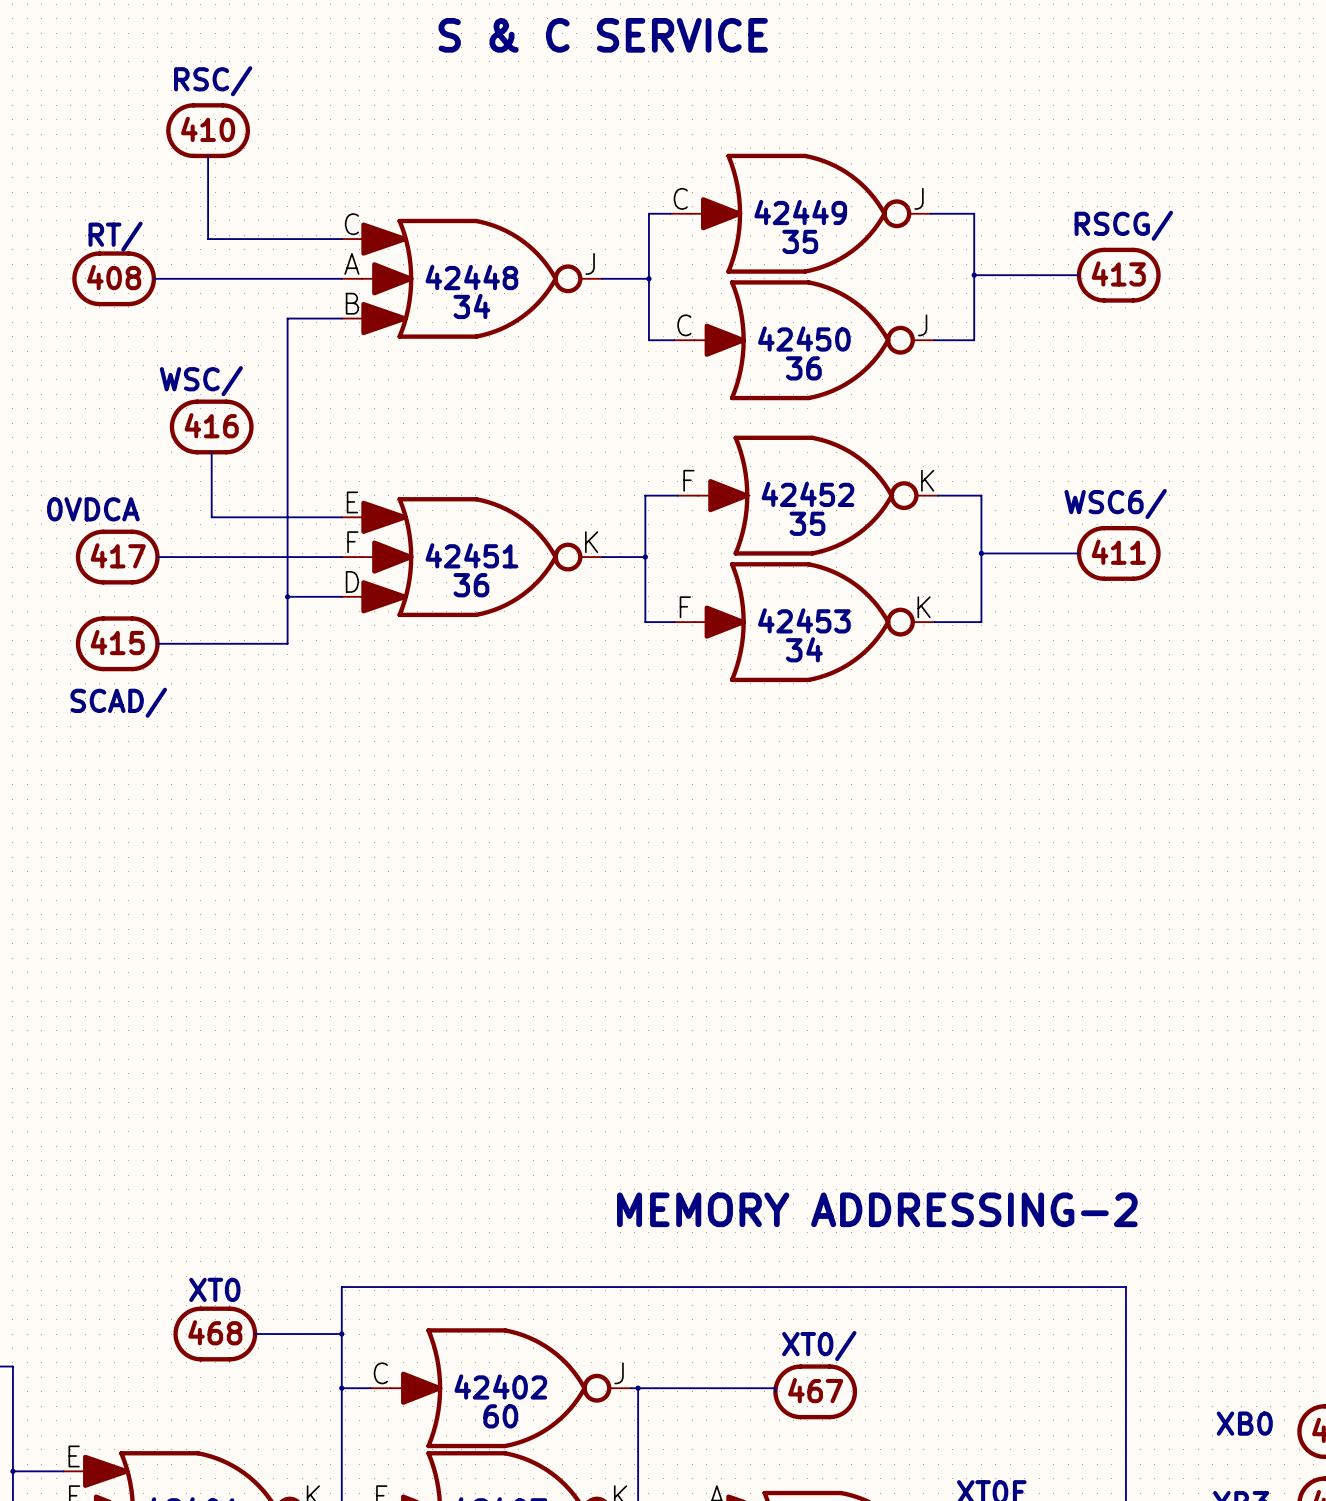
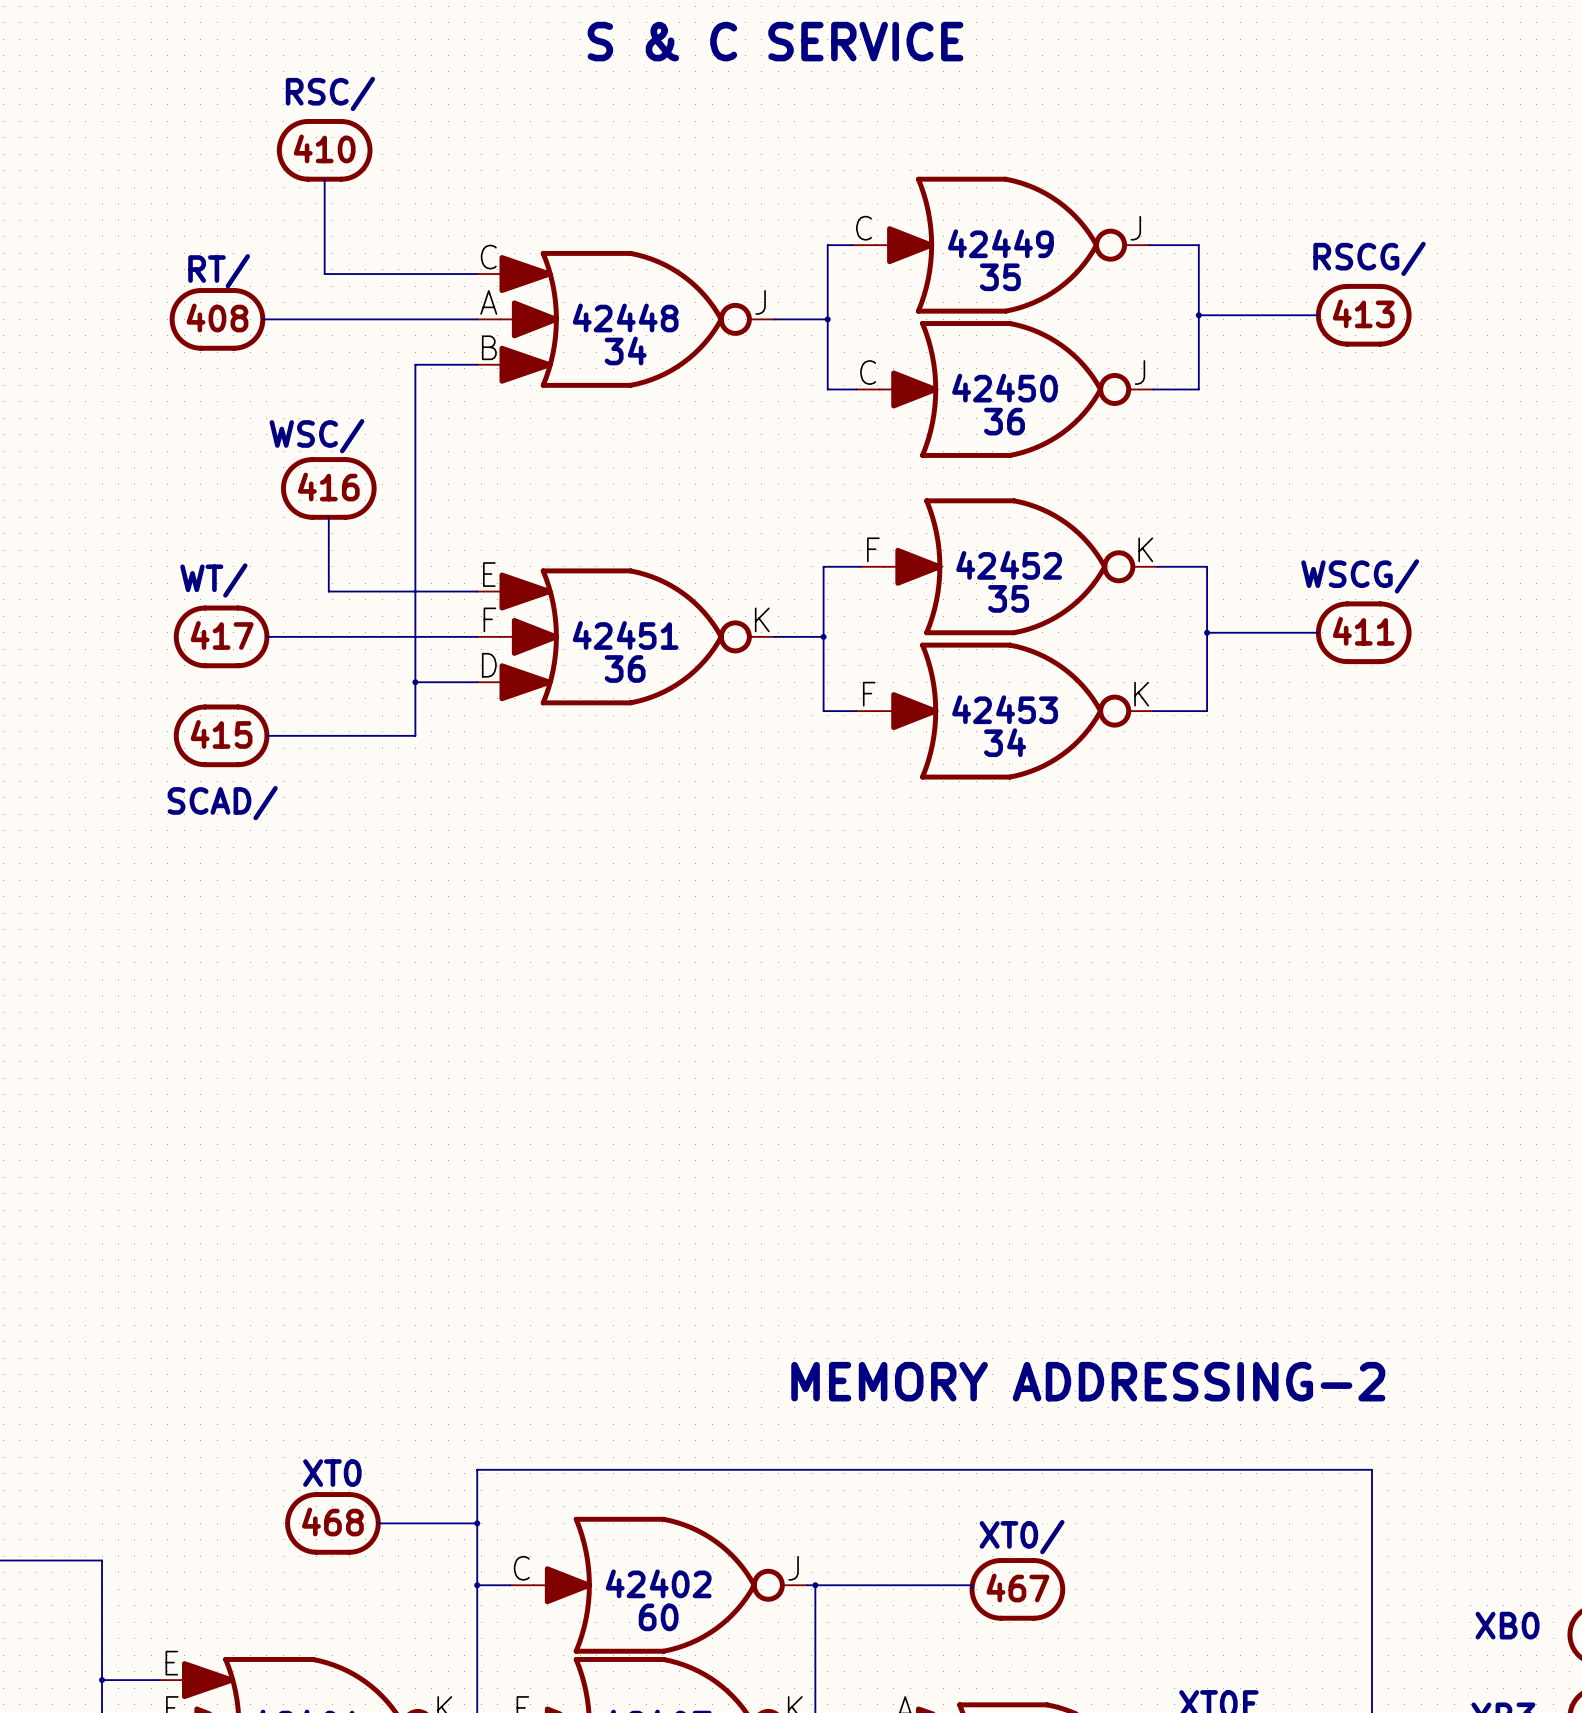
part text: WSC6/ (1115, 504) -> WSCG/ (1360, 576)
part text: 0VDCA (93, 509) -> WT/ (213, 580)

